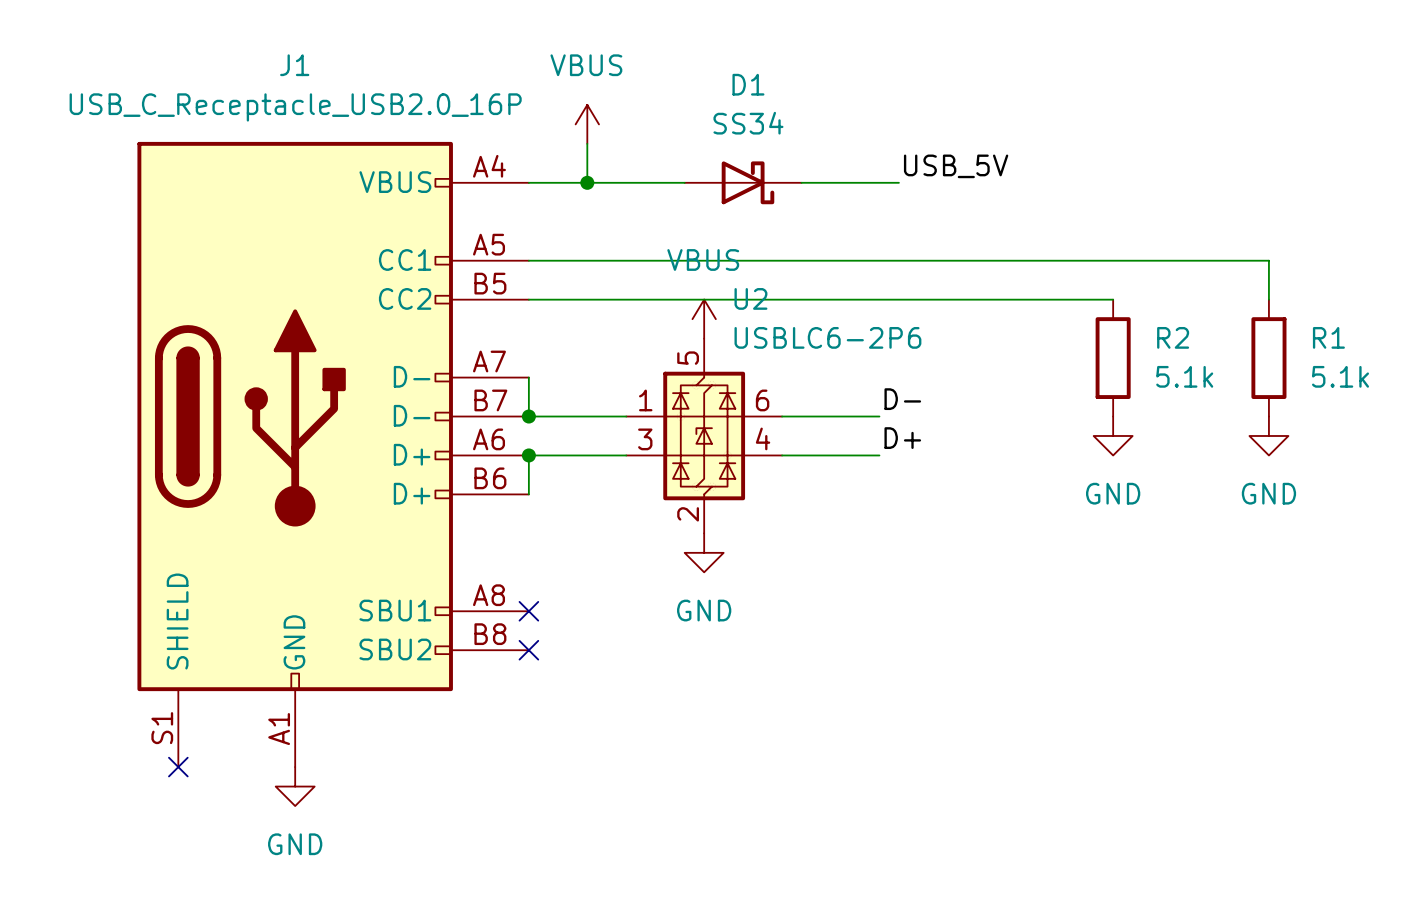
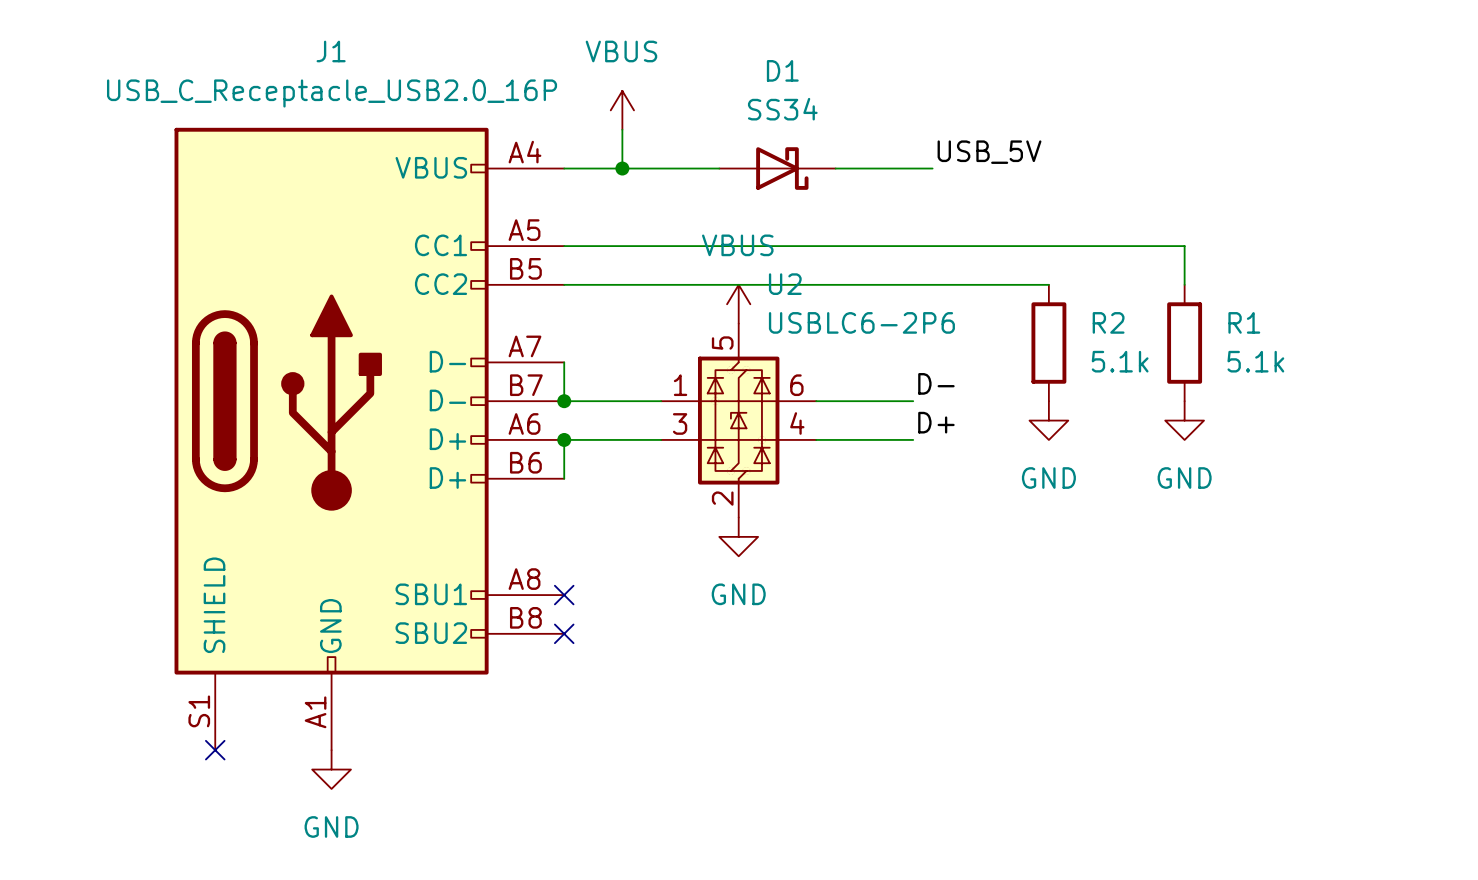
wire: (1152, 260) (1268, 260) (1268, 299) -> (1184, 246) (1184, 284)
wire: (1015, 299) (1113, 299) -> none
R2 position: (1113, 358) -> (1048, 343)
R1 position: (1268, 358) -> (1184, 343)
power symbol: none -> GND (1048, 420)
power symbol position: GND (1113, 435) -> GND (1184, 420)
power symbol: GND (1268, 435) -> none

